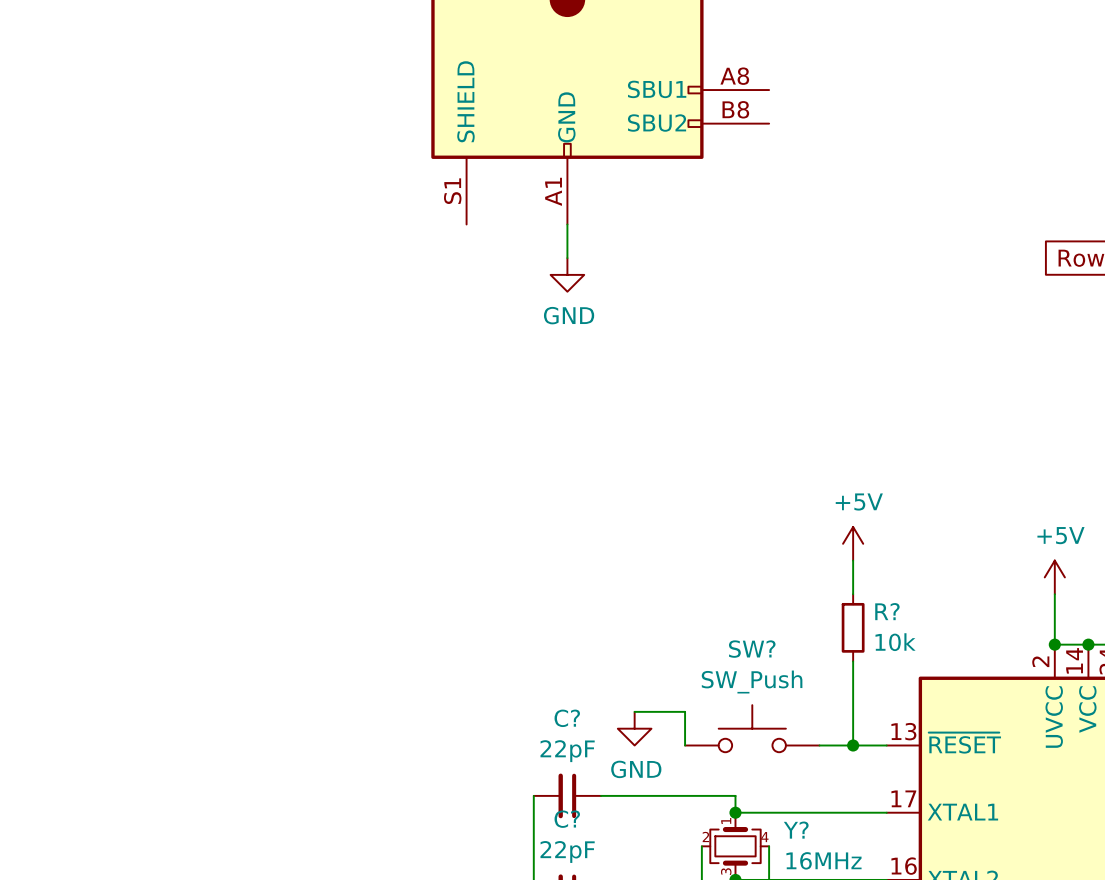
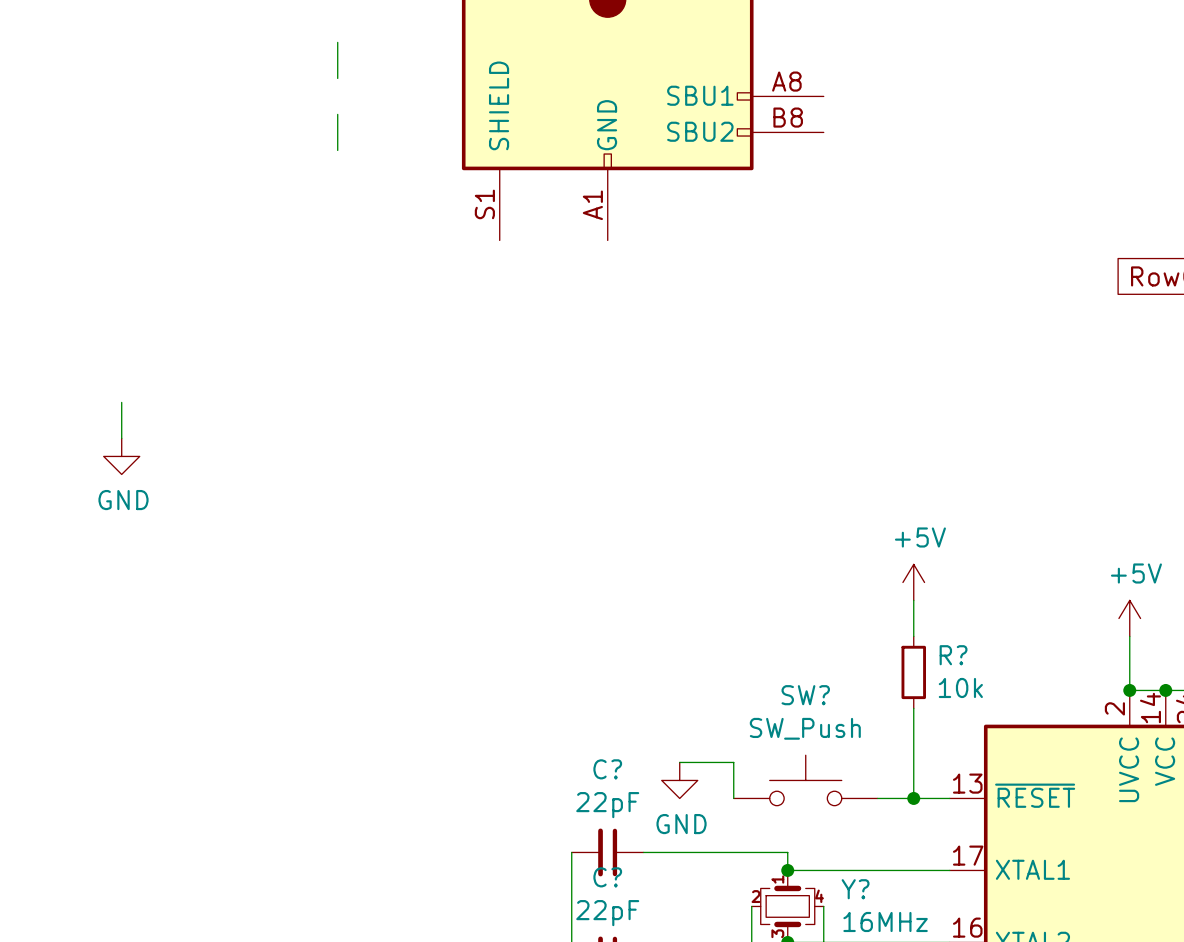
wire: none -> (337, 42) (337, 78)
wire: (567, 224) (567, 258) -> (337, 114) (337, 150)
power symbol: GND (567, 274) -> none
wire: none -> (121, 402) (121, 438)
power symbol: none -> GND (121, 456)

